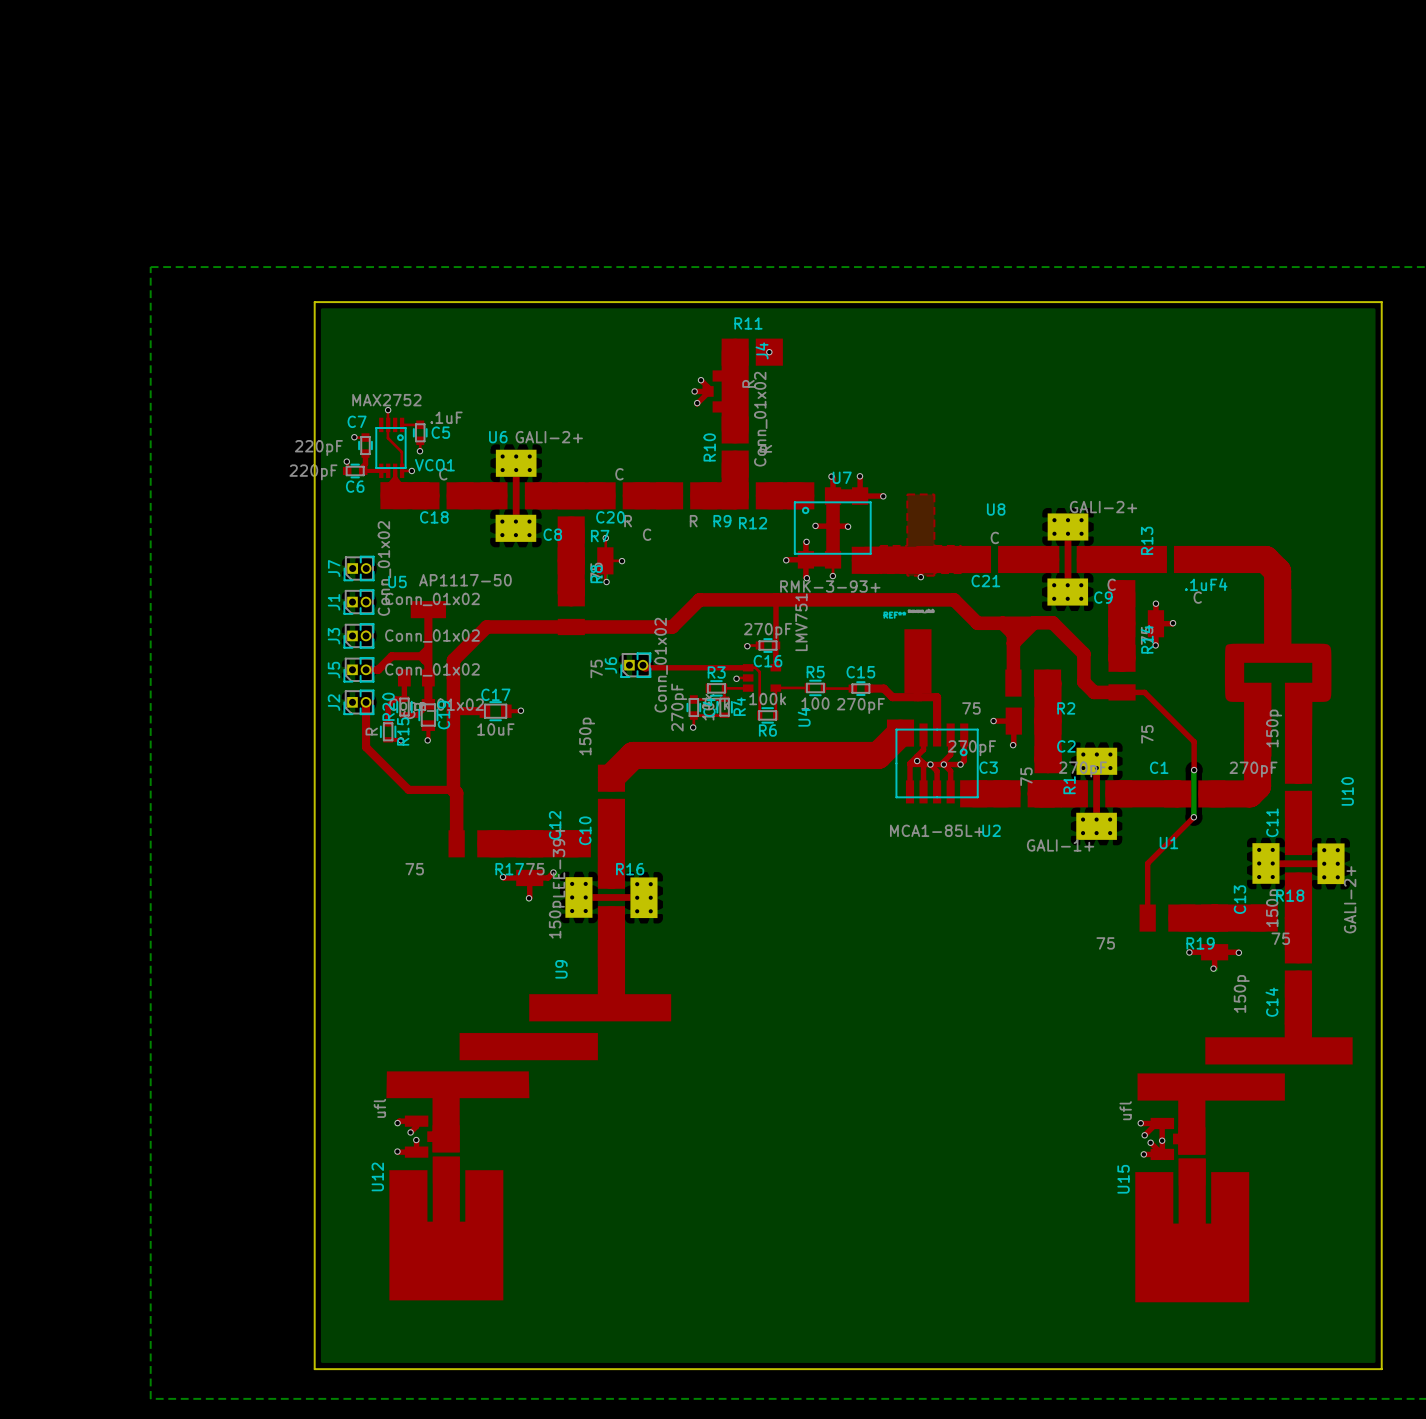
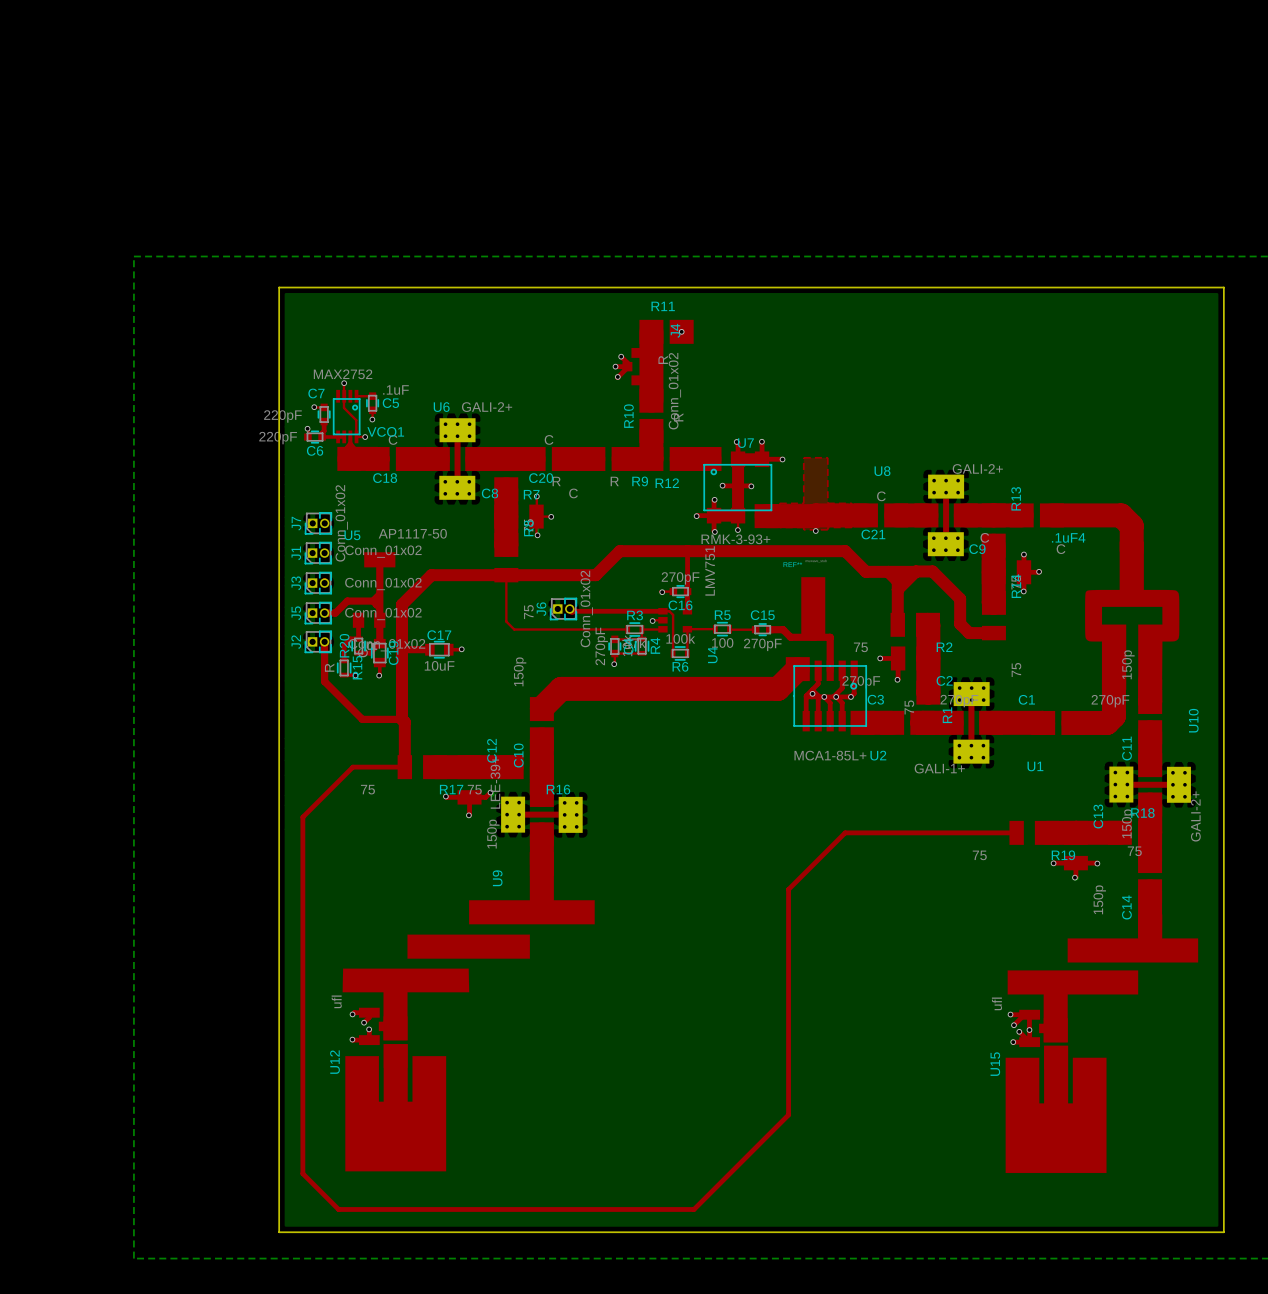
top track: none -> (506, 575) (506, 621) (514, 629) (627, 629)
top track: (1122, 692) (1144, 692) (1194, 741) (1194, 770) -> none
bottom track: (1194, 770) (1193, 817) -> none
via: (1194, 770) -> none
top track: (1193, 817) (1147, 863) (1147, 918) -> (404, 767) (352, 767) (302, 817) (302, 1173) (338, 1209) (694, 1209) (788, 1114) (788, 889) (845, 832) (1016, 832)
via: (1193, 817) -> none

